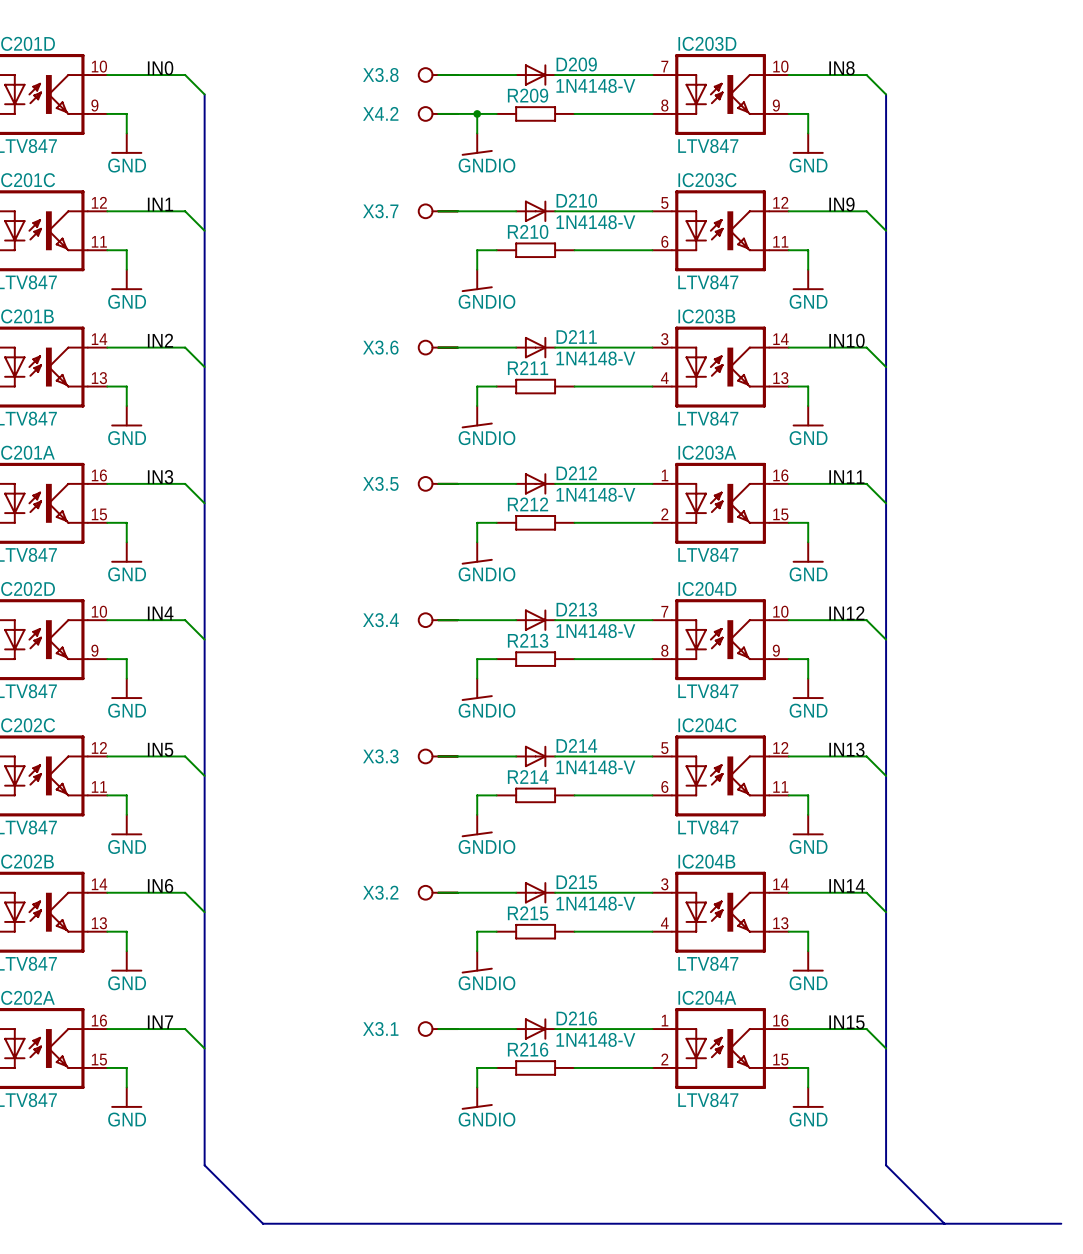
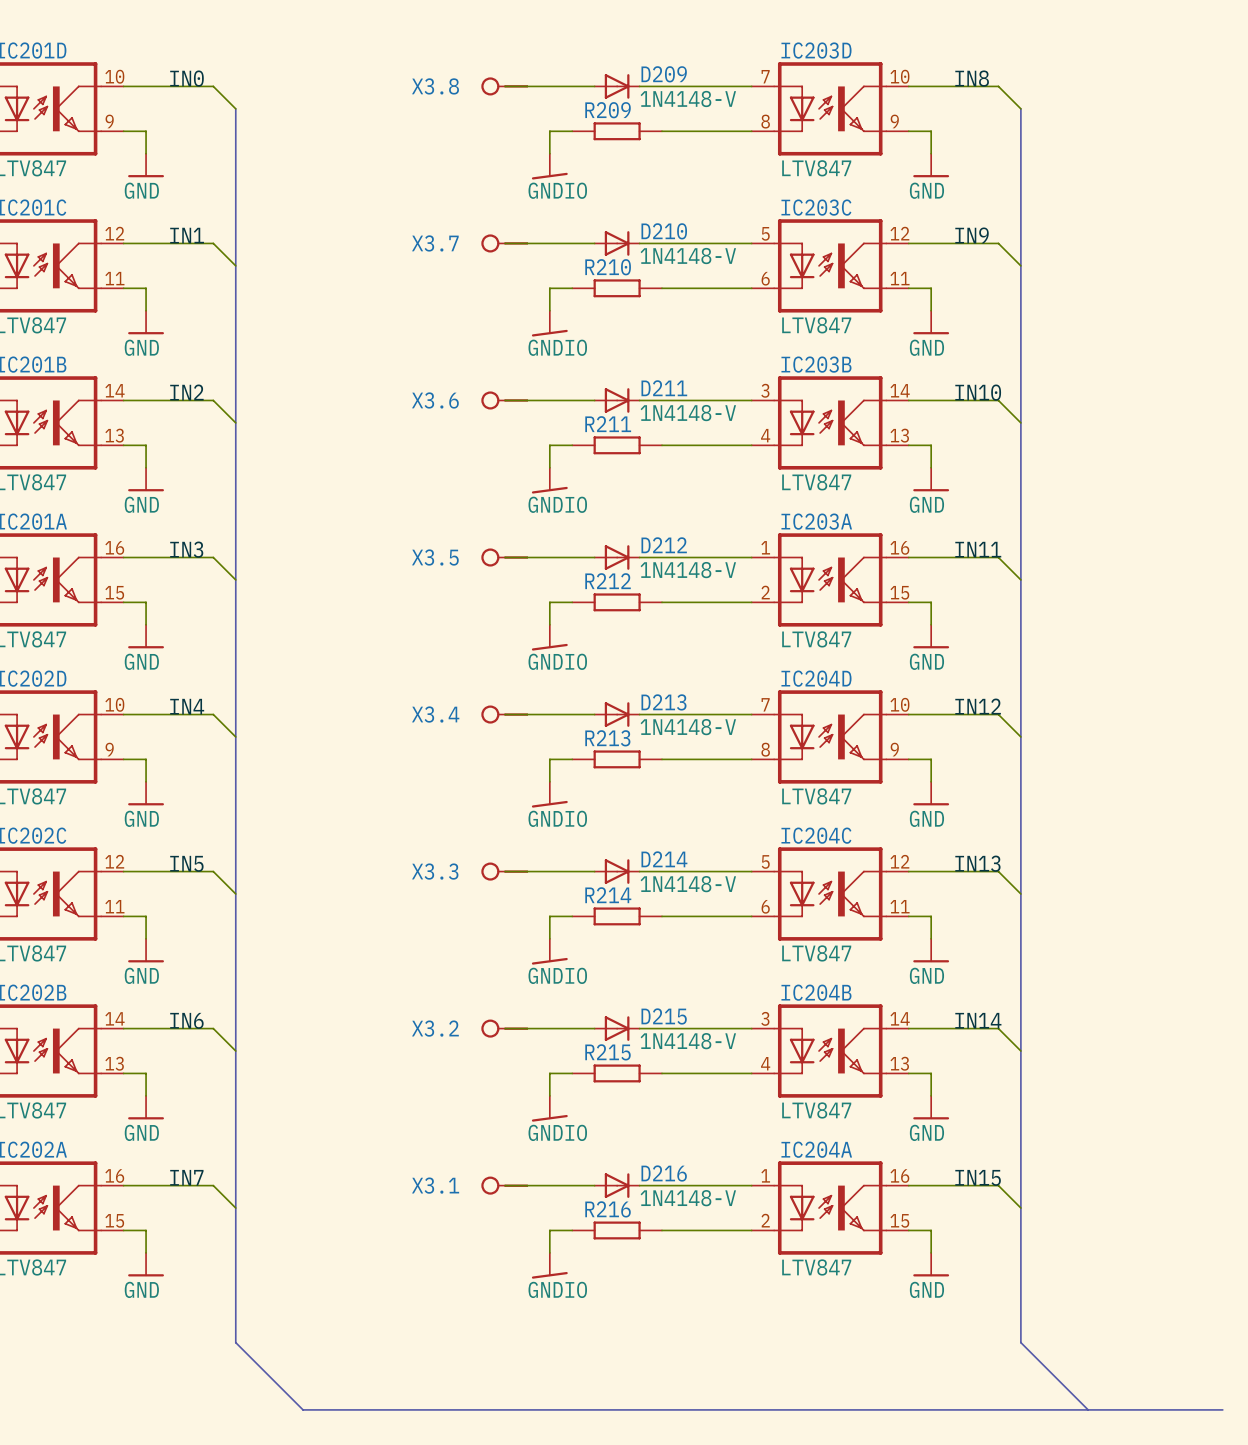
X4.2: (437, 113) -> none
wire: (438, 113) (477, 113) -> none
junction: (477, 113) -> none

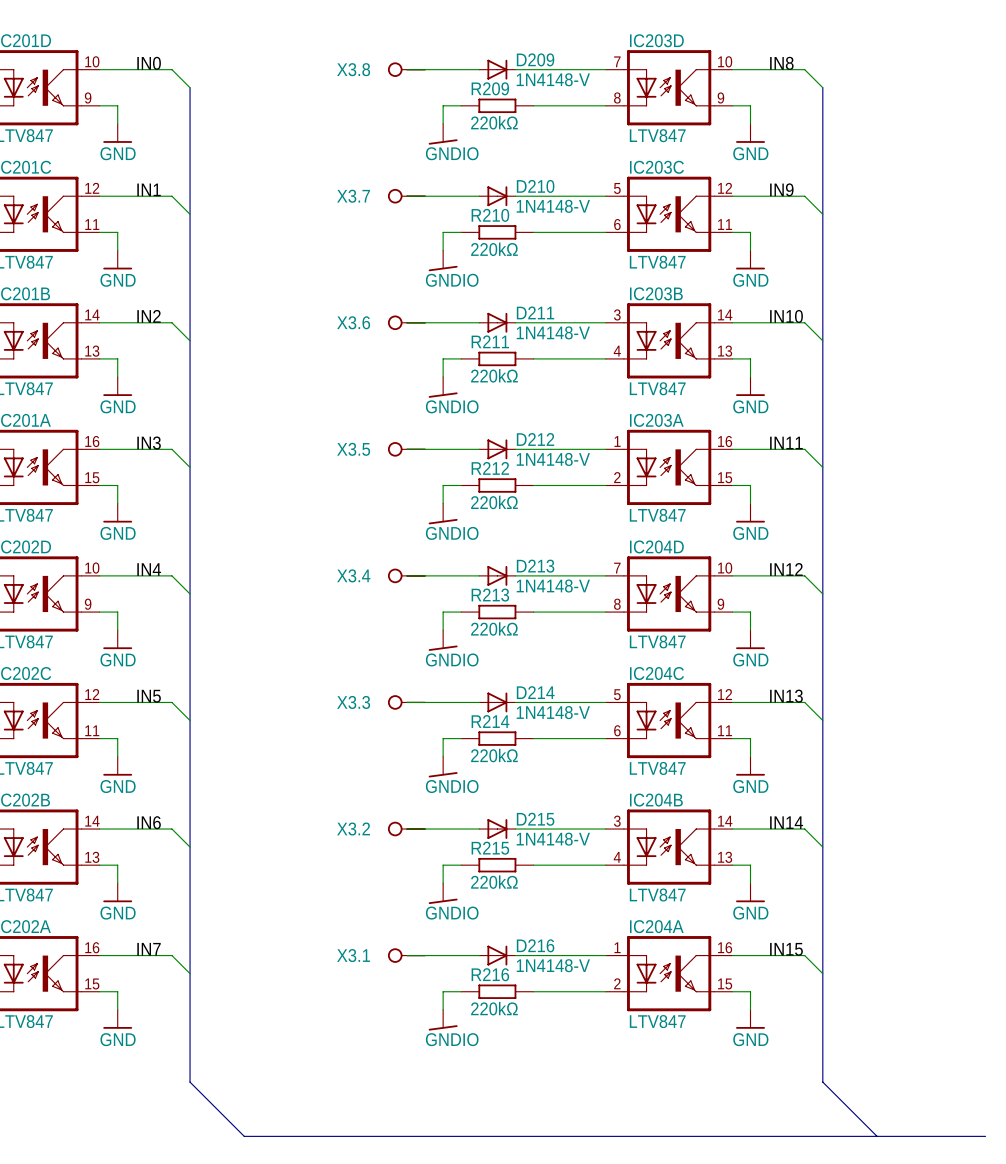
R209 value: none -> 220kΩ (494, 122)
R210 value: none -> 220kΩ (494, 249)
R211 value: none -> 220kΩ (494, 375)
R212 value: none -> 220kΩ (494, 502)
R213 value: none -> 220kΩ (494, 628)
R214 value: none -> 220kΩ (494, 755)
R215 value: none -> 220kΩ (494, 882)
R216 value: none -> 220kΩ (494, 1008)

